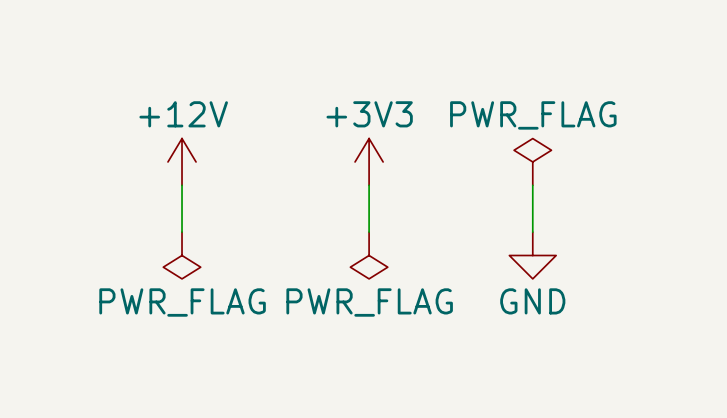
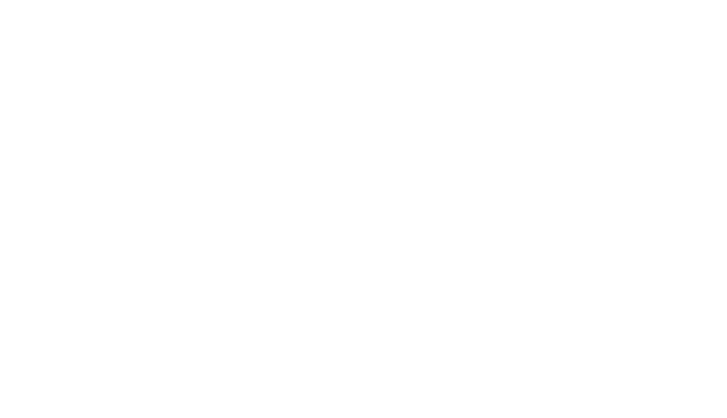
power symbol: +12V (182, 161) -> none
power symbol: +3V3 (369, 161) -> none
power symbol: PWR_FLAG (532, 161) -> none
wire: (182, 185) (182, 232) -> none
wire: (369, 185) (369, 232) -> none
wire: (532, 185) (532, 232) -> none
power symbol: PWR_FLAG (182, 255) -> none
power symbol: PWR_FLAG (369, 255) -> none
power symbol: GND (532, 255) -> none

